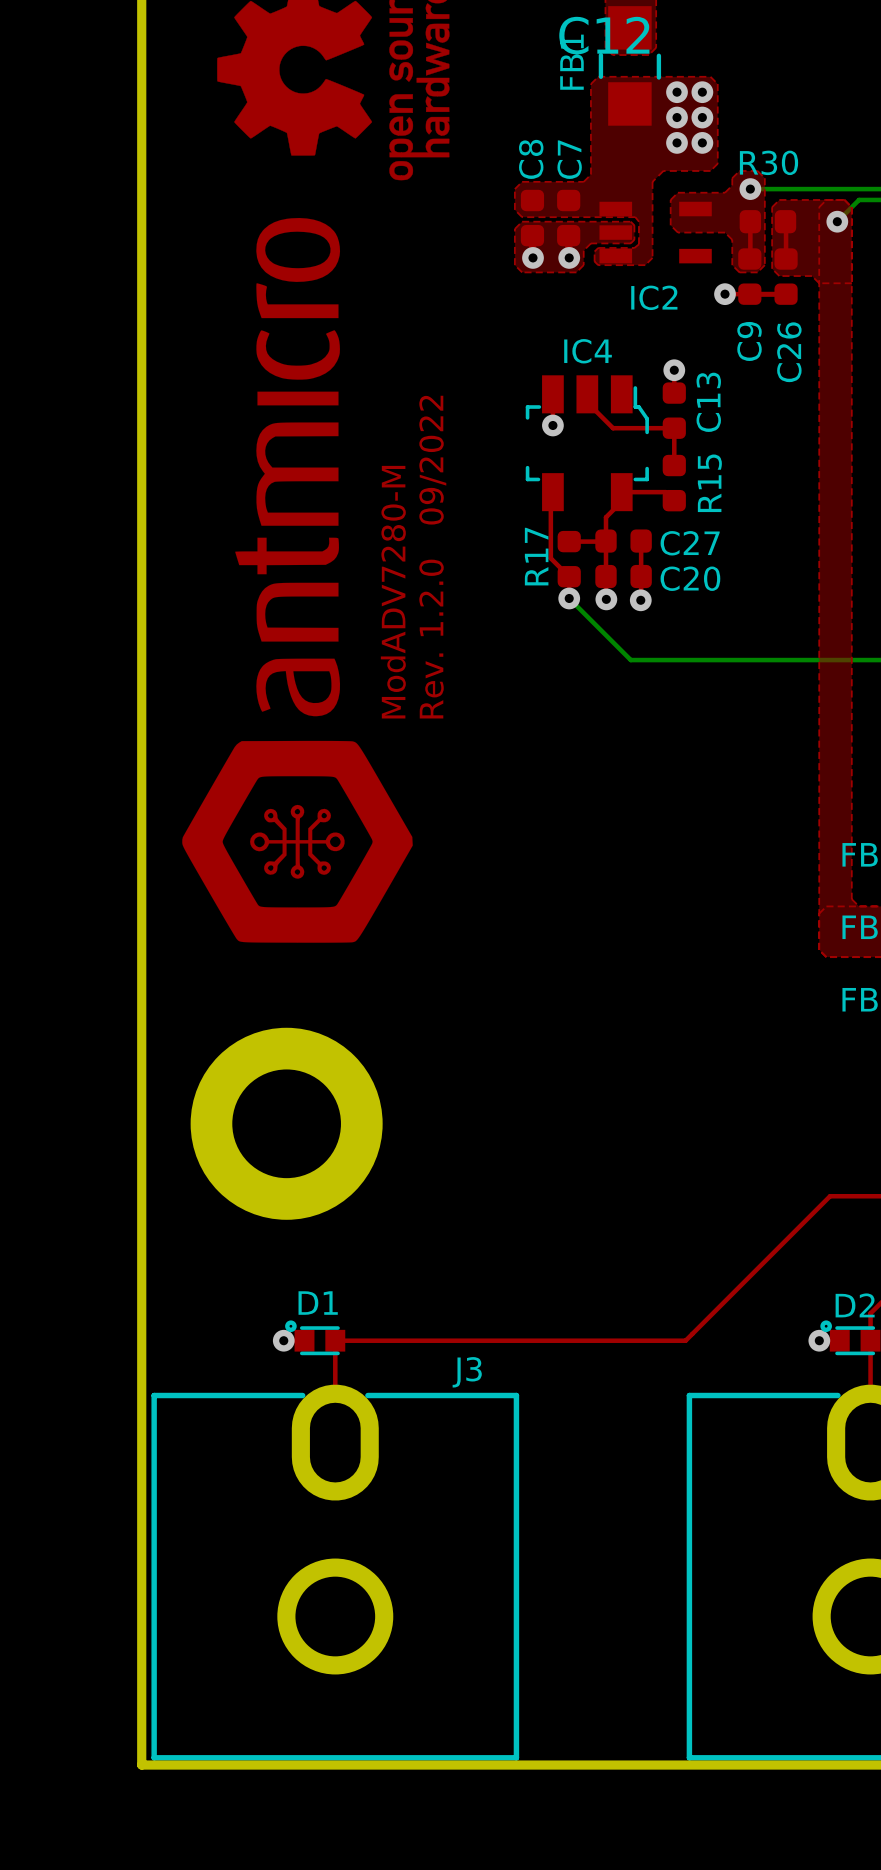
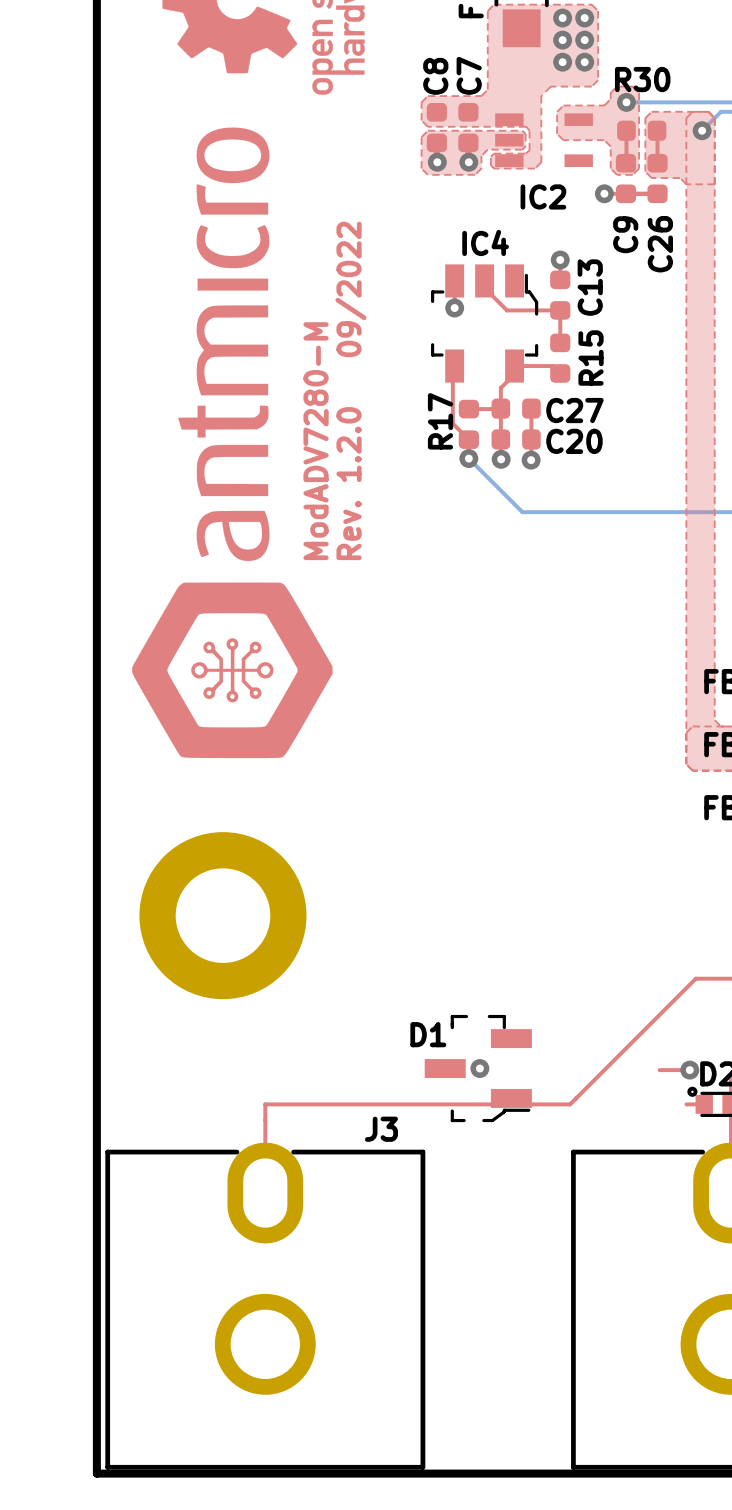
via: none -> (479, 1068)
top track: none -> (659, 1070) (689, 1070)
D1 footprint: [285, 1320, 346, 1356] -> [424, 1014, 532, 1123]
via: (283, 1340) -> none
via position: (819, 1340) -> (689, 1070)

